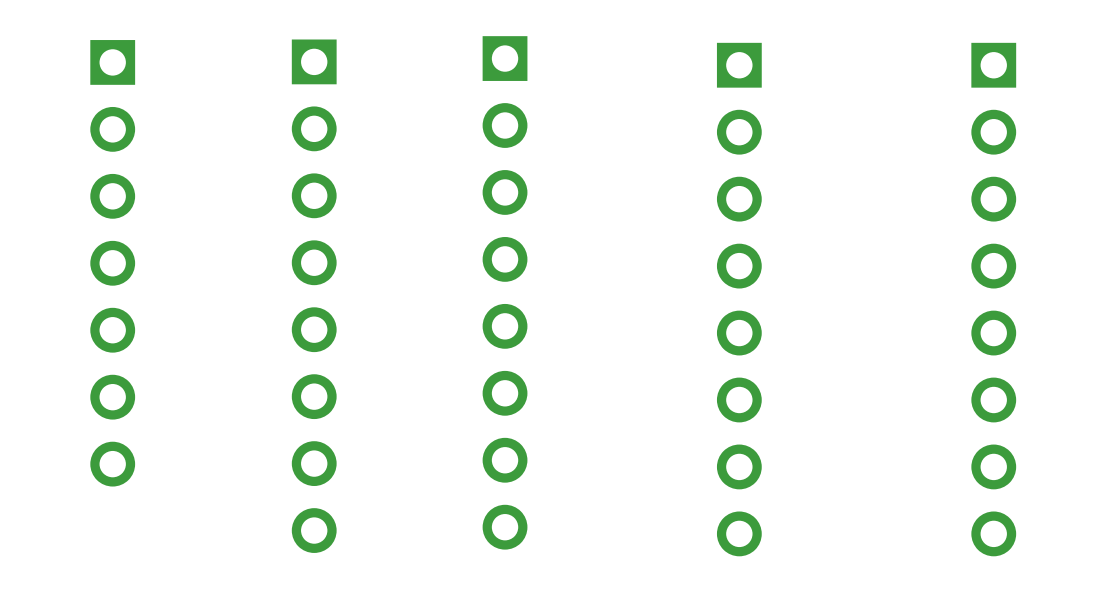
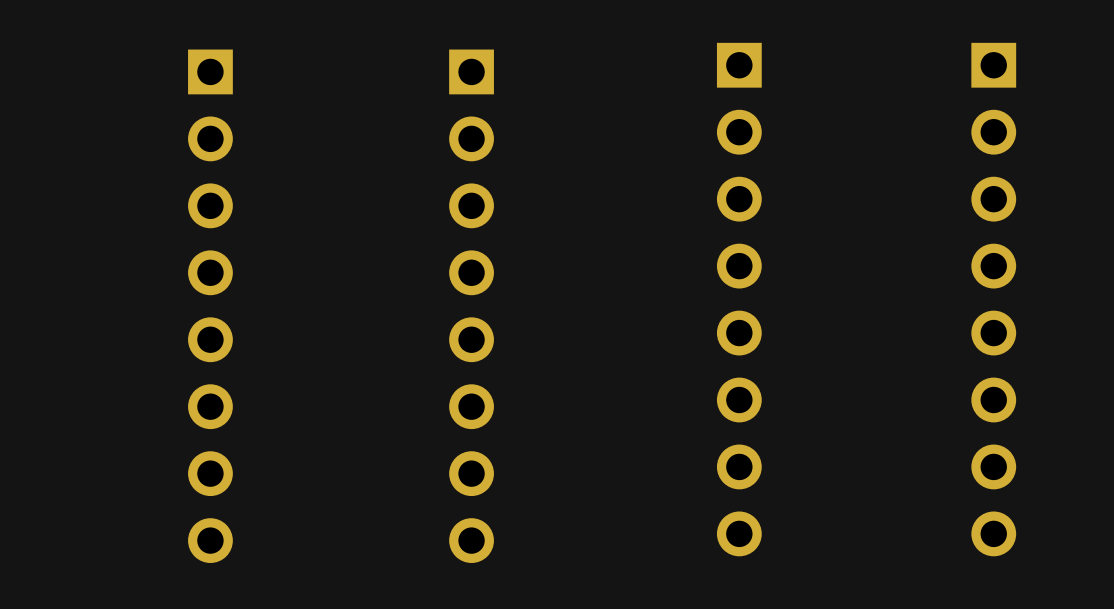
part: (112, 263) -> none
part position: (505, 292) -> (471, 306)
part: (314, 296) -> none
part: none -> (210, 306)

